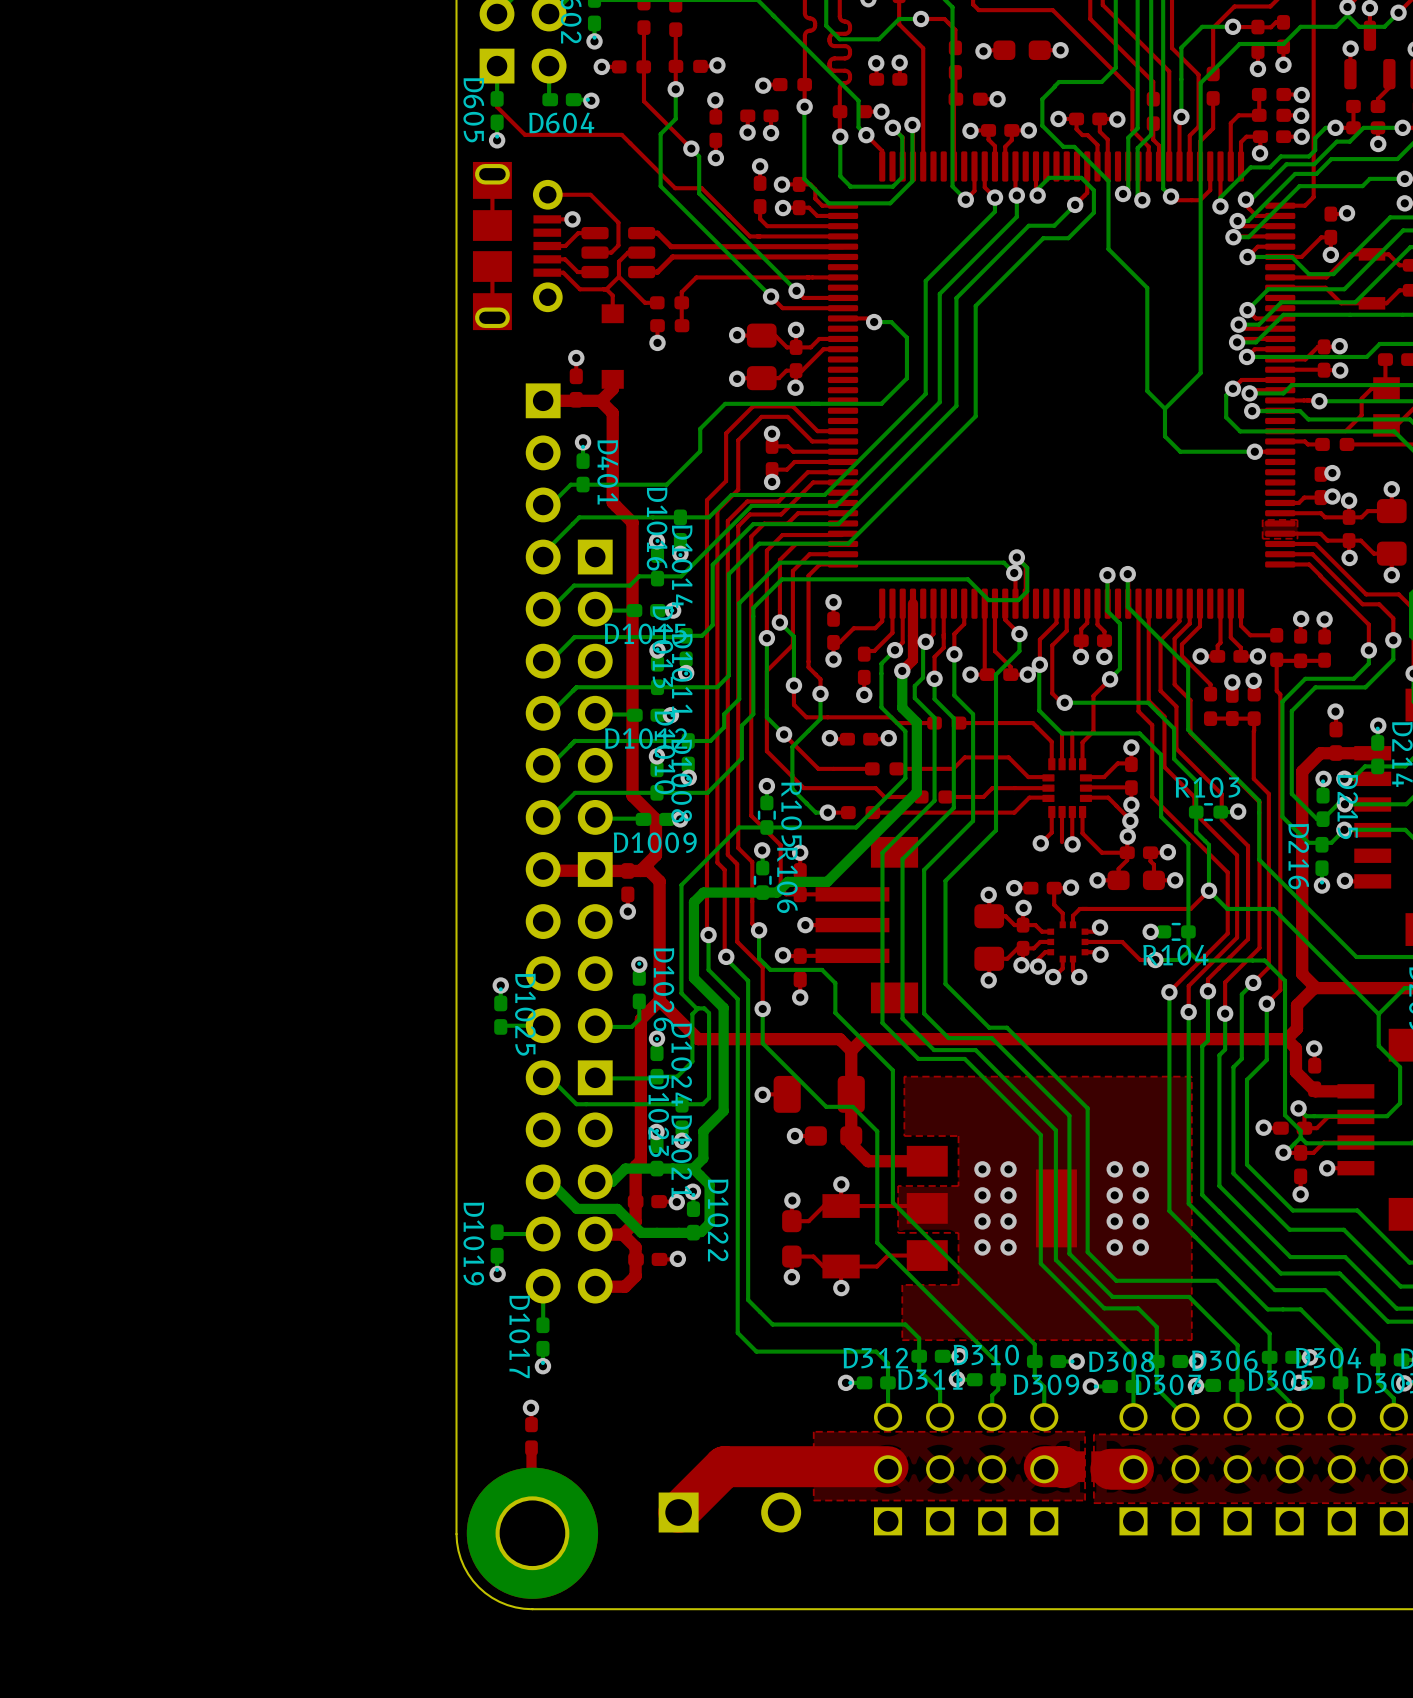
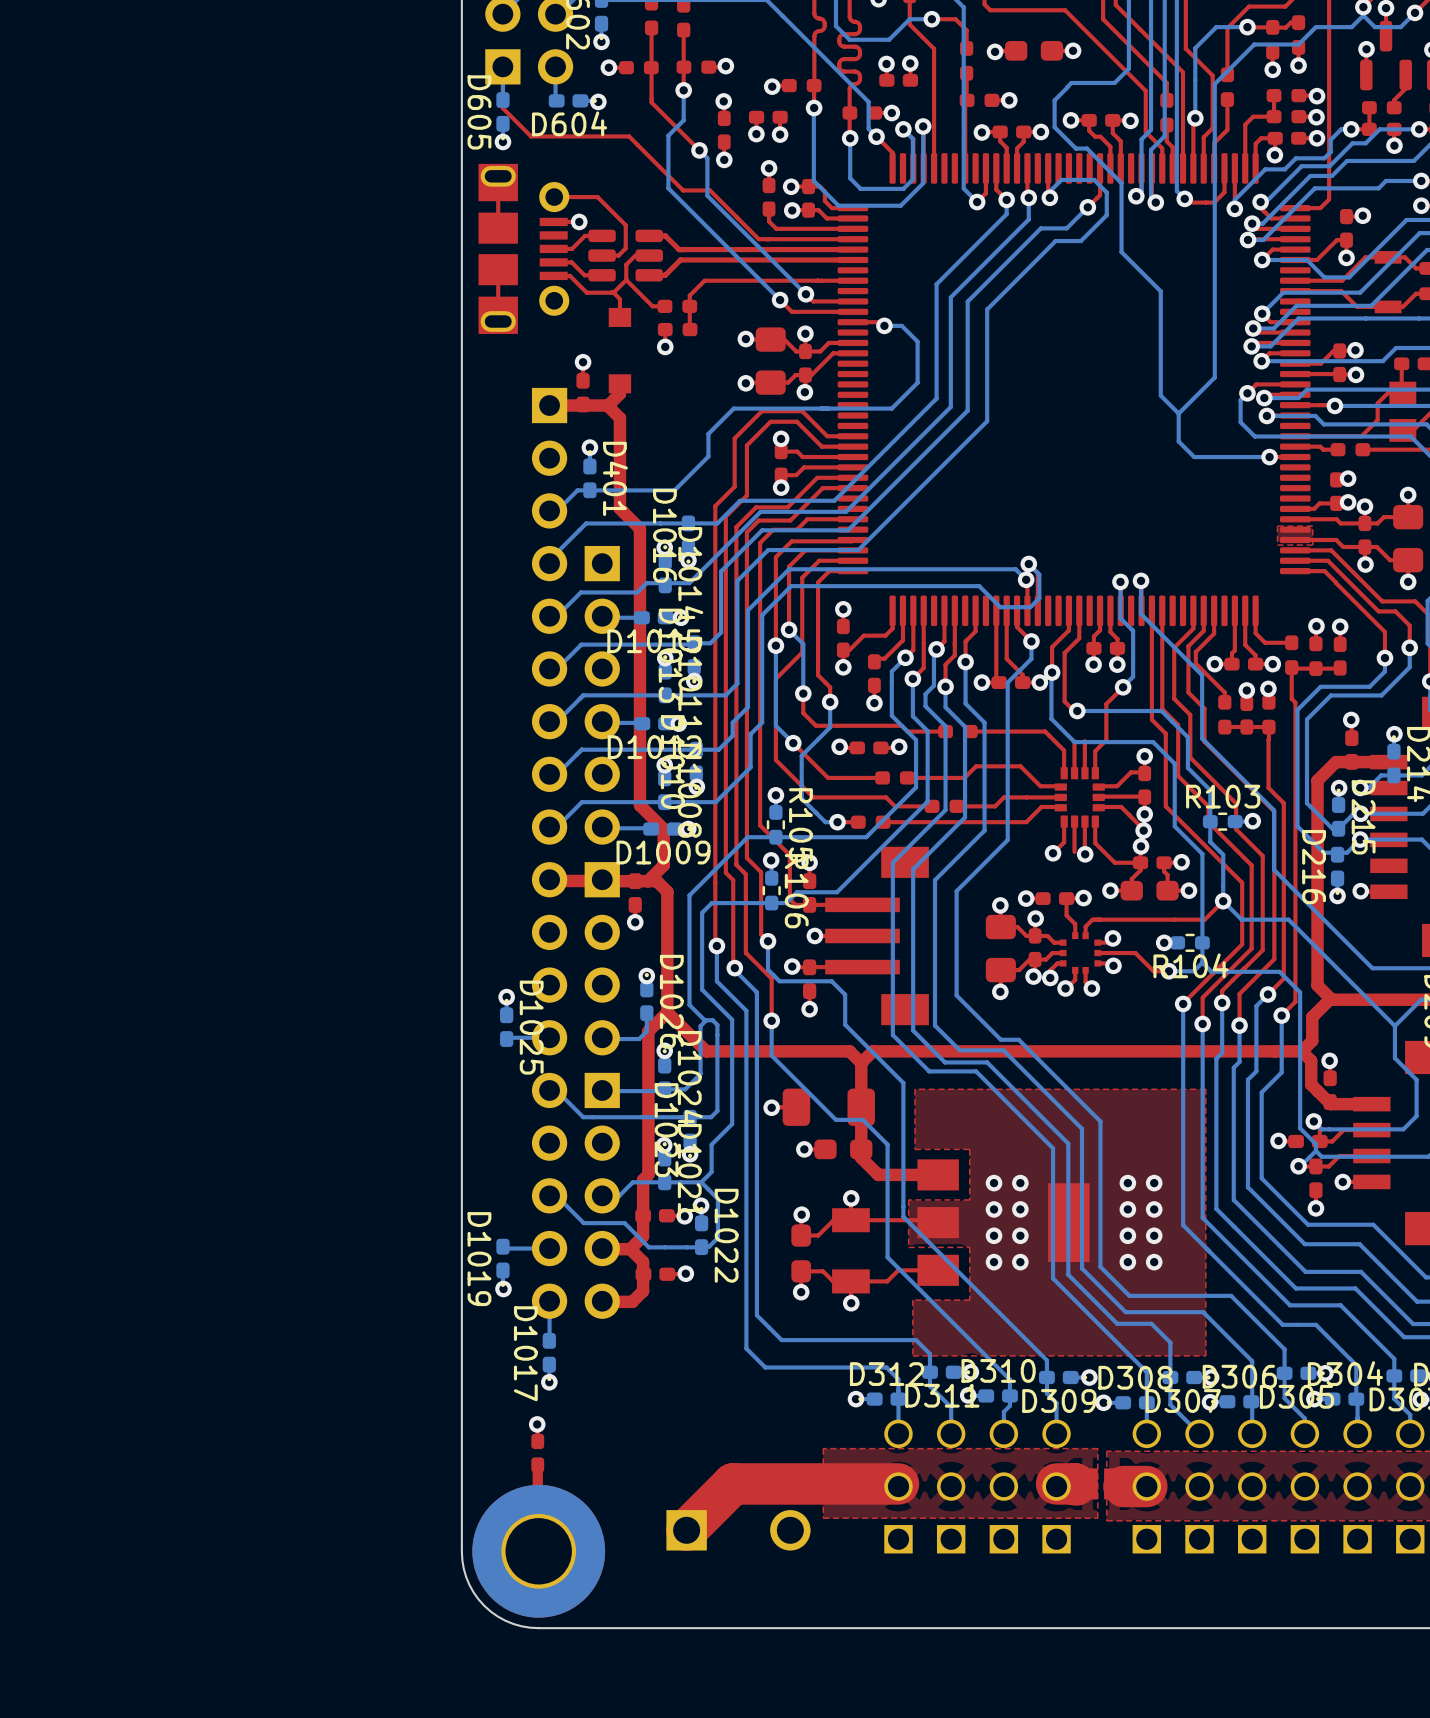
top track width: thick (912, 603) (912, 660) (902, 670) -> thin (923, 610) (923, 668) (912, 678)
bottom track width: thick (902, 670) (902, 707) (916, 722) (916, 792) (827, 881) (787, 881) (777, 892) (703, 892) (693, 902) (693, 978) (723, 1007) (723, 1111) (703, 1131) (703, 1158) (693, 1168) -> thin (912, 678) (912, 716) (927, 731) (927, 801) (837, 892) (796, 892) (786, 903) (711, 903) (702, 912) (702, 989) (732, 1019) (732, 1124) (711, 1144) (711, 1172) (701, 1182)
bottom track width: thick (693, 1168) (625, 1168) (612, 1181) (595, 1181) -> thin (701, 1182) (632, 1182) (619, 1195) (602, 1195)
bottom track width: thick (693, 1168) (709, 1185) (709, 1223) (701, 1232) (691, 1232) -> thin (701, 1182) (717, 1198) (717, 1237) (709, 1246) (700, 1246)
bottom track width: thick (550, 1182) (577, 1208) (617, 1208) (641, 1232) (694, 1232) -> thin (557, 1196) (583, 1223) (624, 1223) (648, 1247) (702, 1247)

